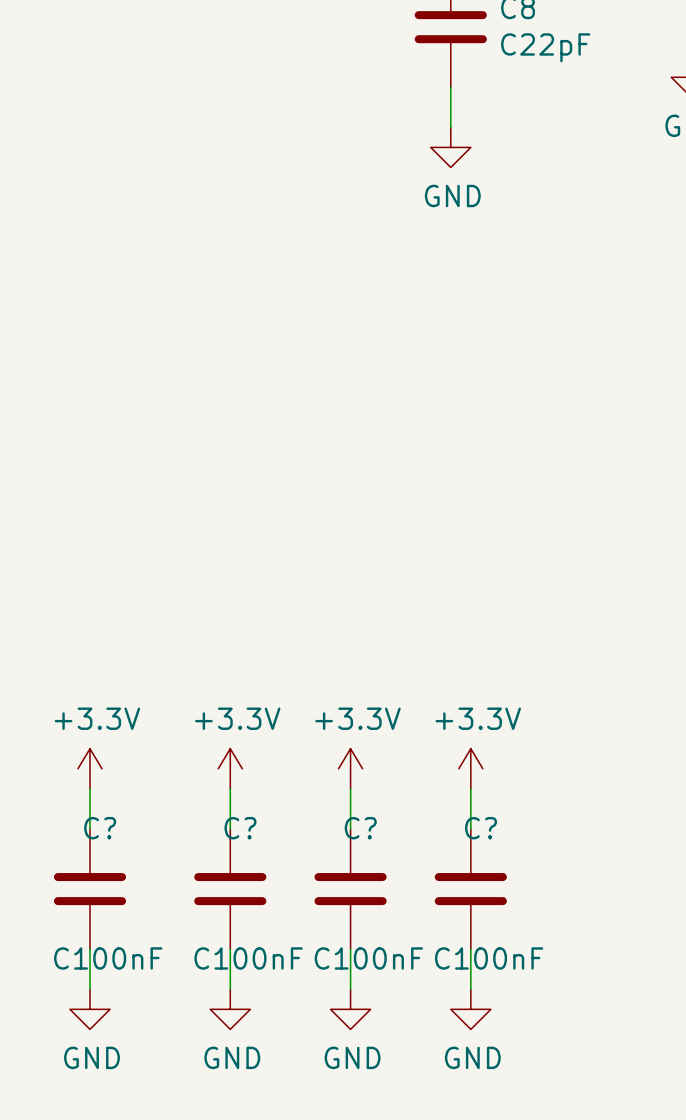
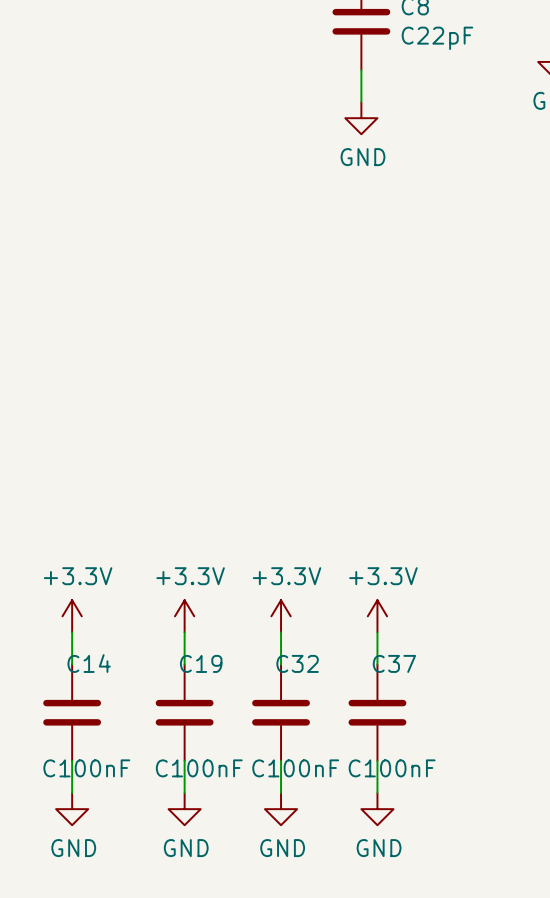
C? name: C? (100, 828) -> C14 (89, 663)
C? name: C? (240, 828) -> C19 (201, 663)
C? name: C? (360, 828) -> C32 (297, 663)
C? name: C? (481, 828) -> C37 (394, 663)

